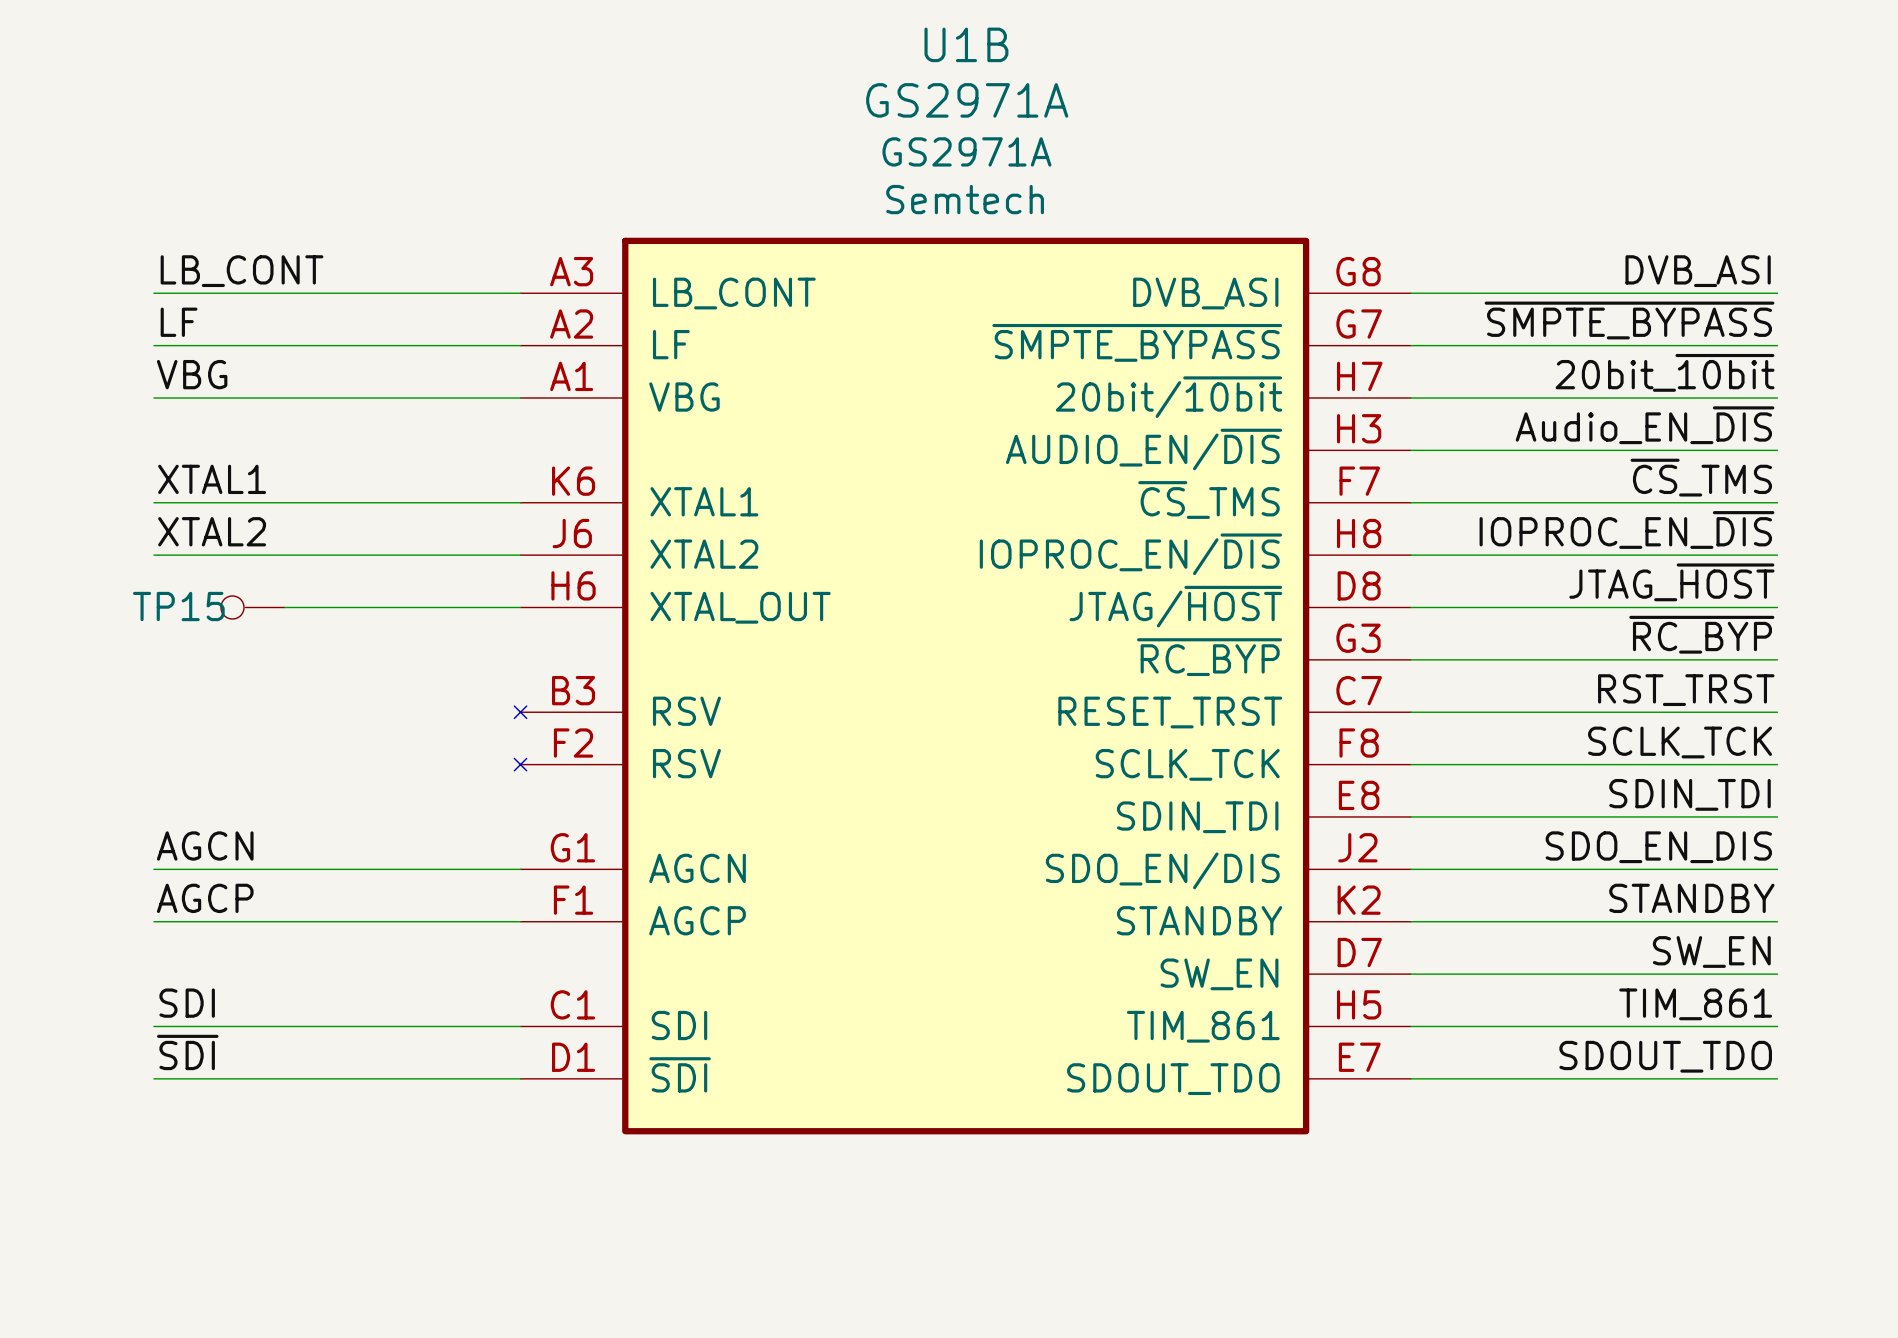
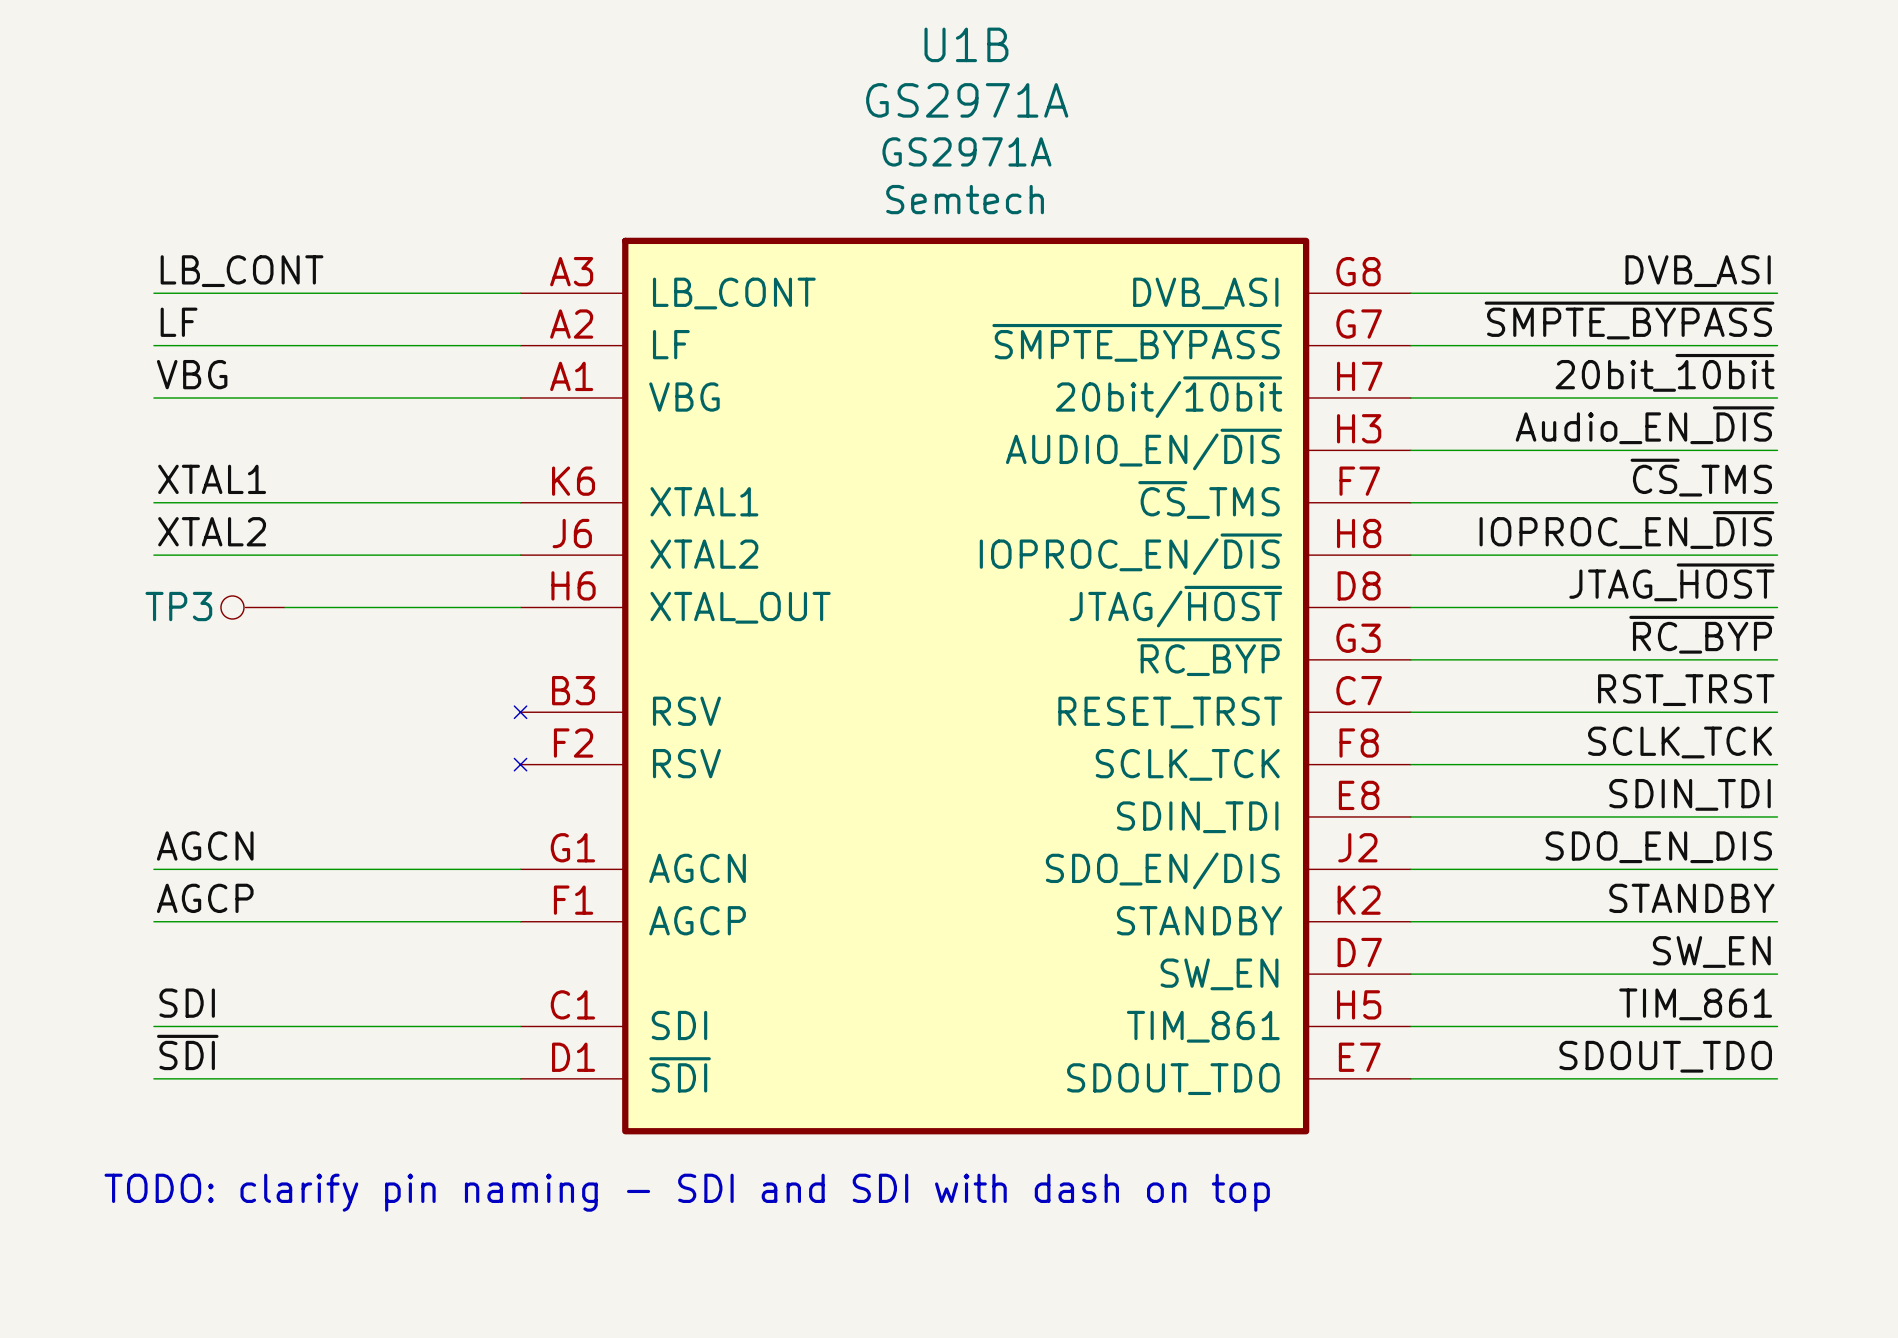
TP15 name: TP15 (178, 606) -> TP3 (178, 606)
text: none -> TODO: clarify pin naming - SDI and SDI with dash on top (687, 1192)

